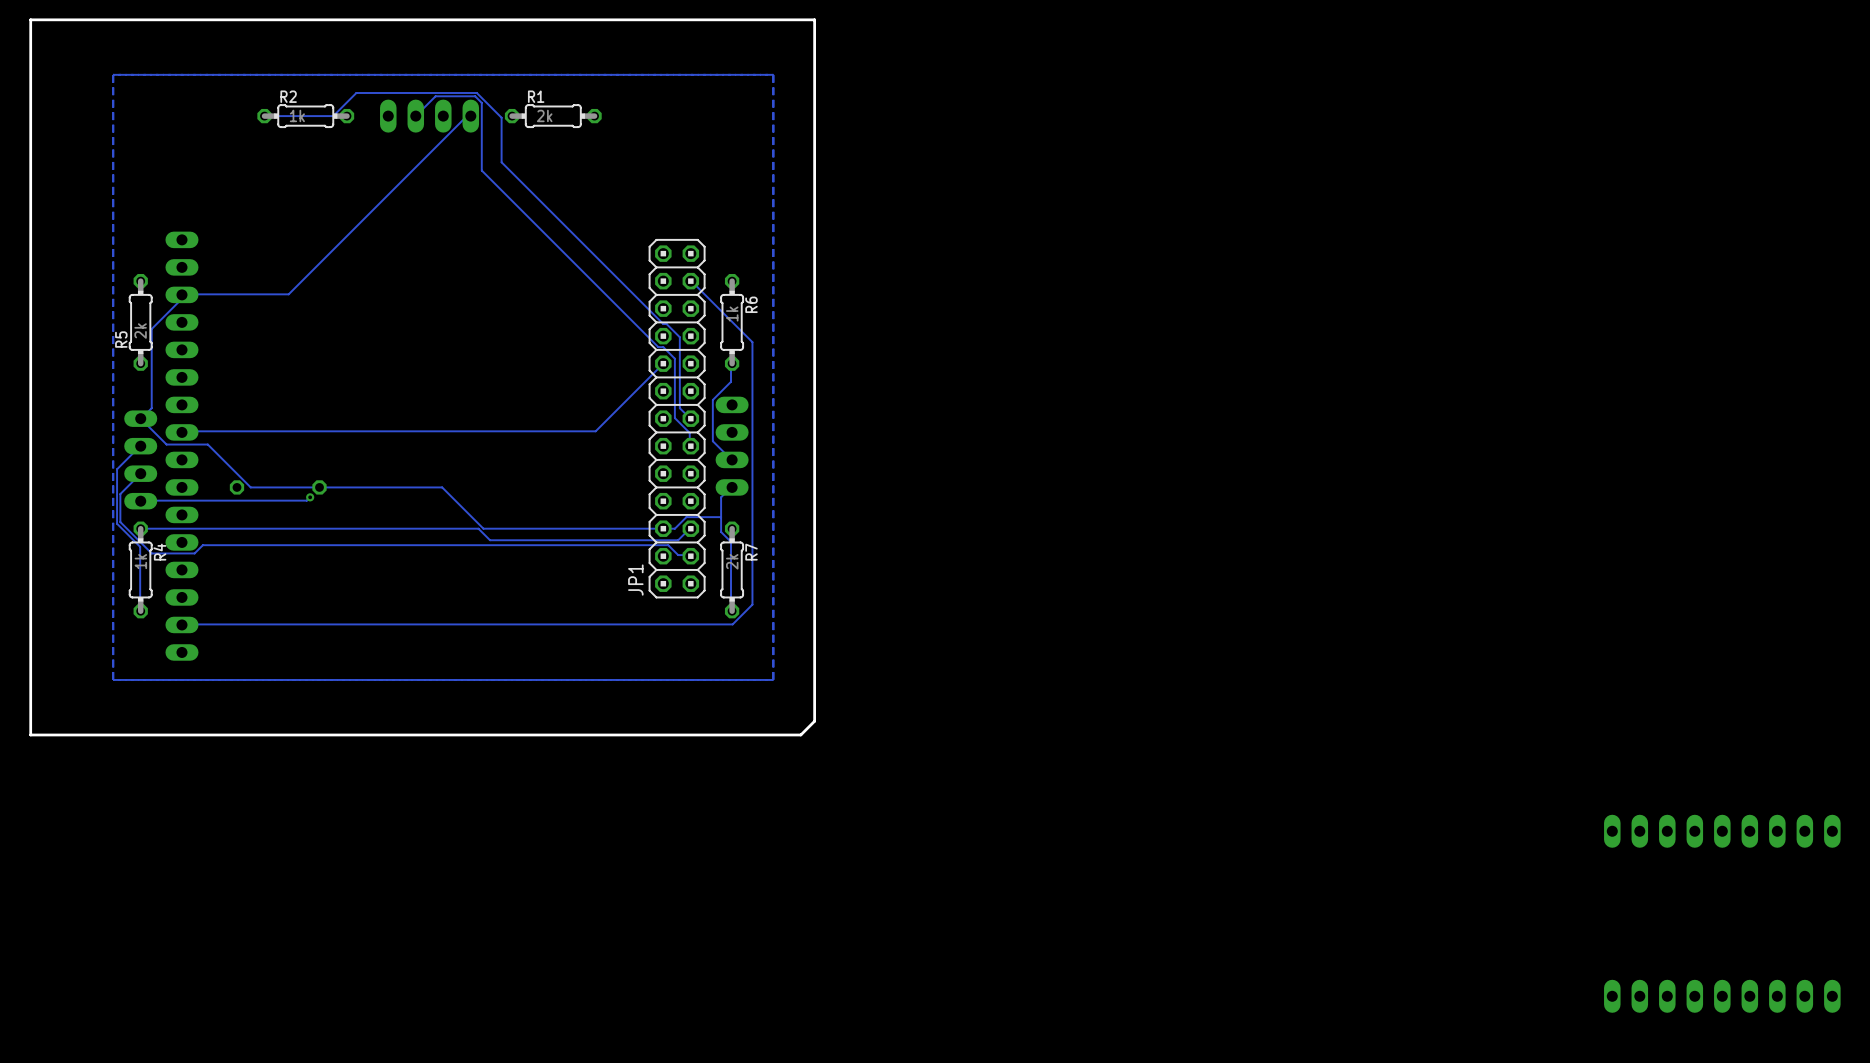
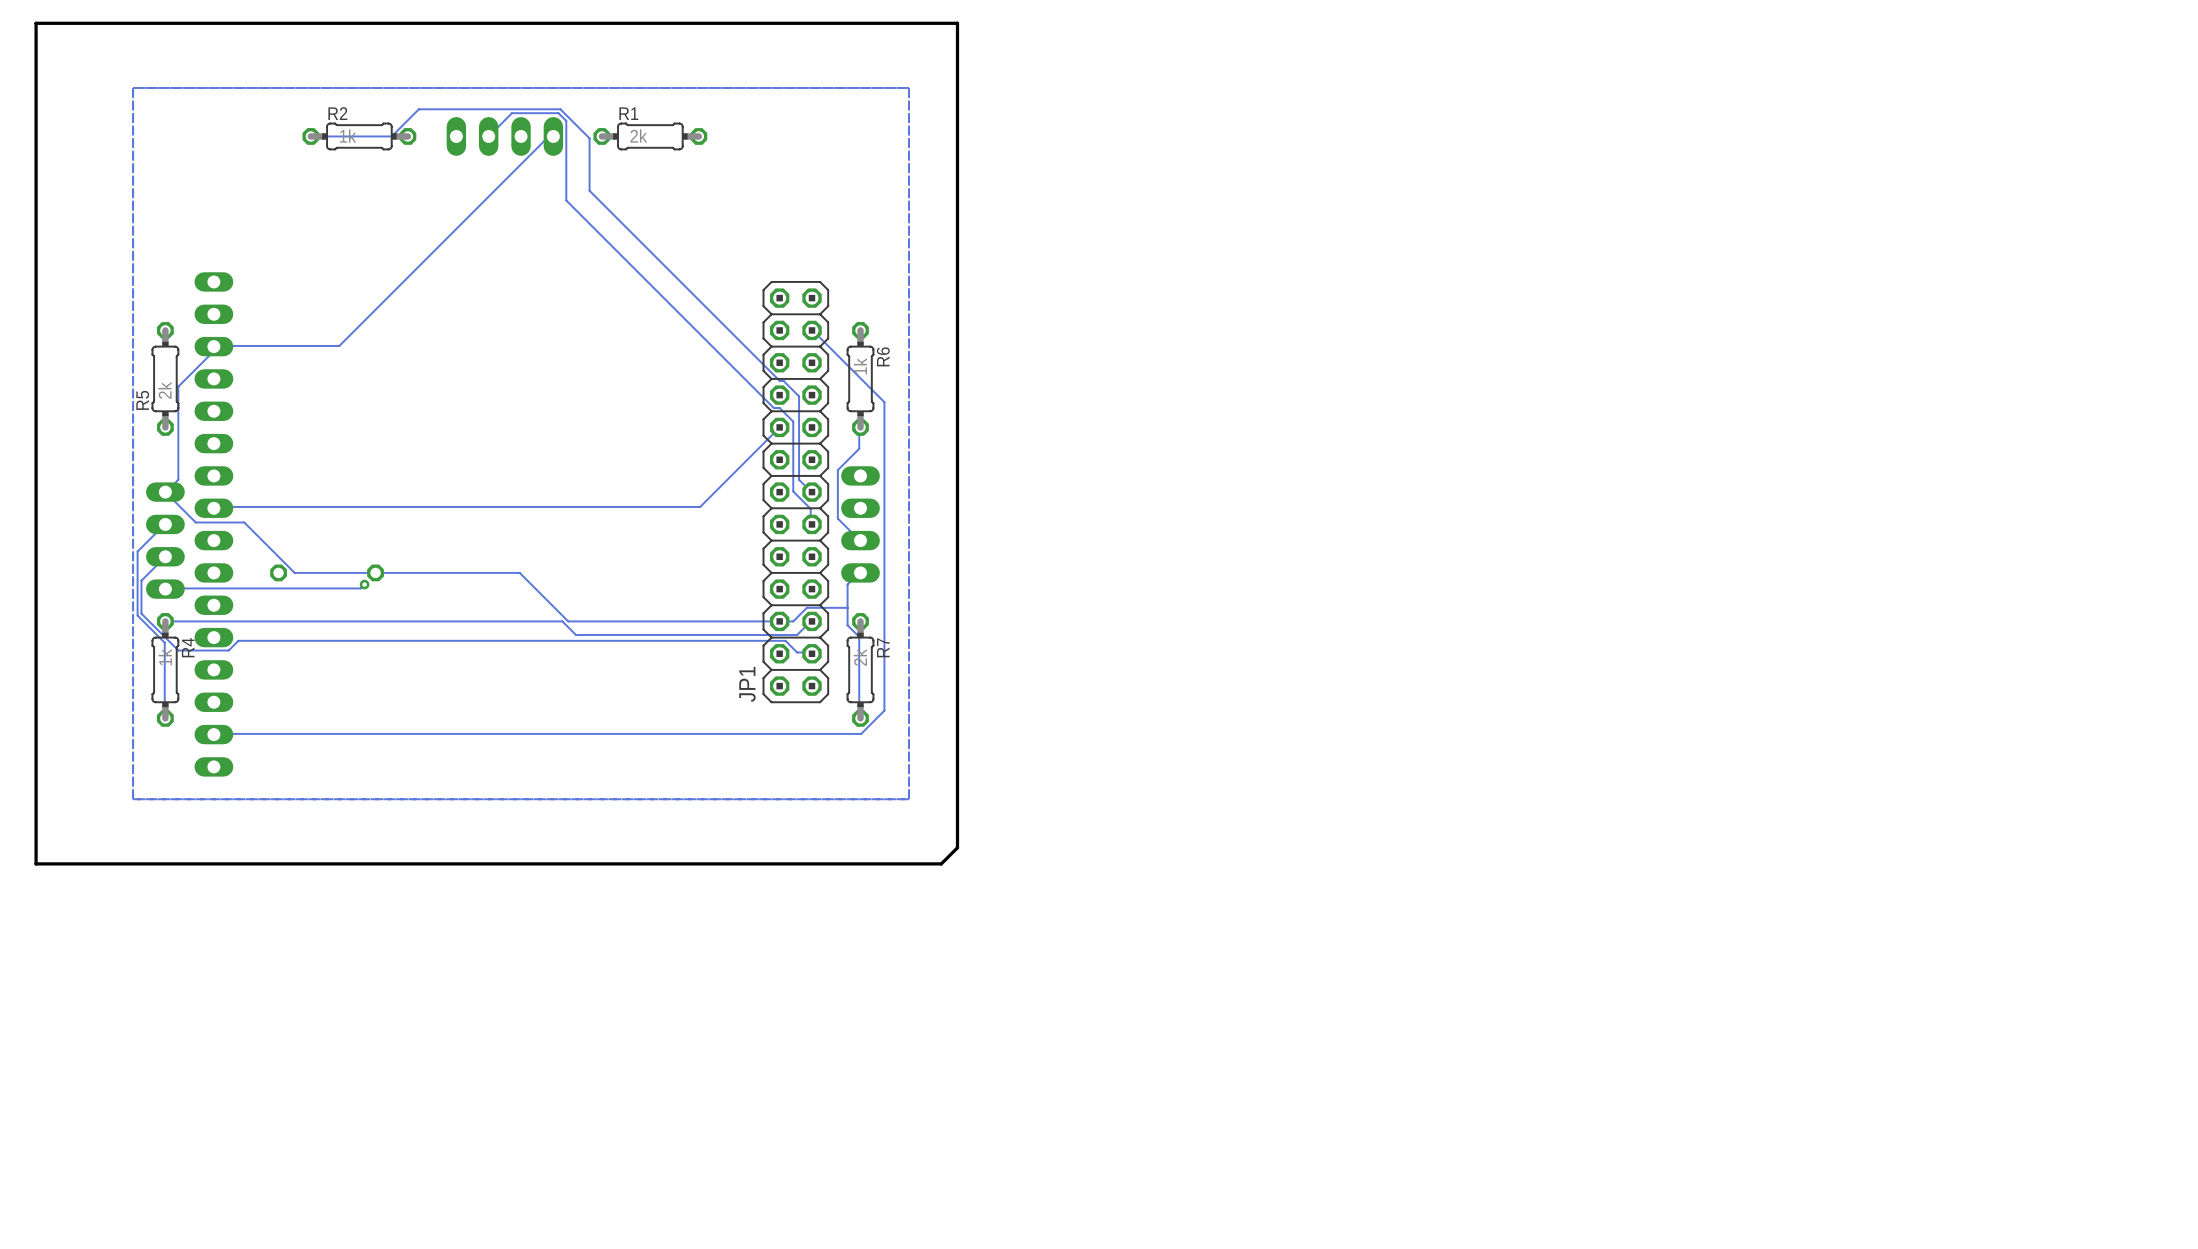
part: (1722, 831) -> none
part: (1722, 996) -> none

